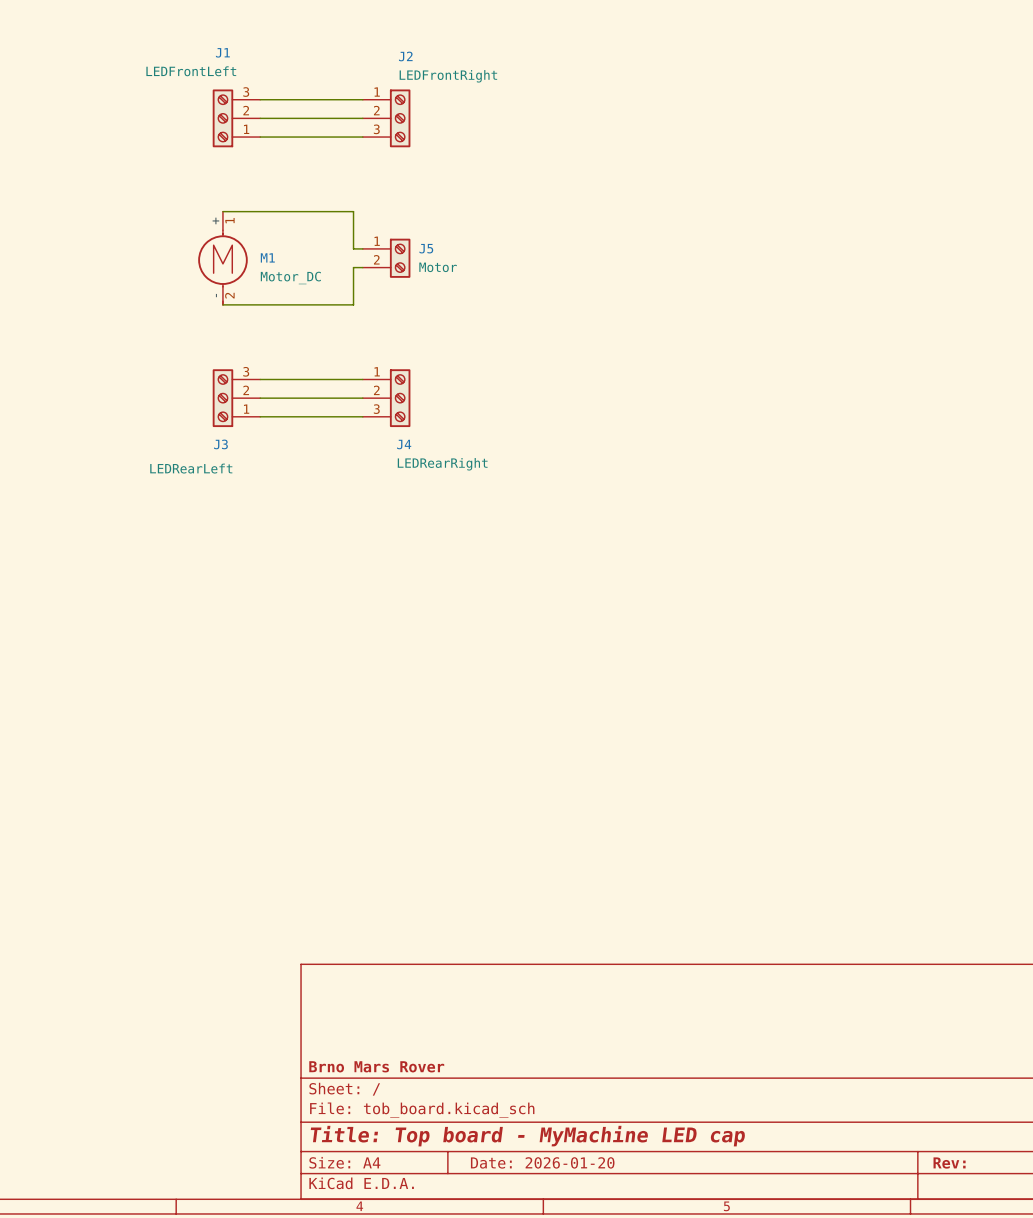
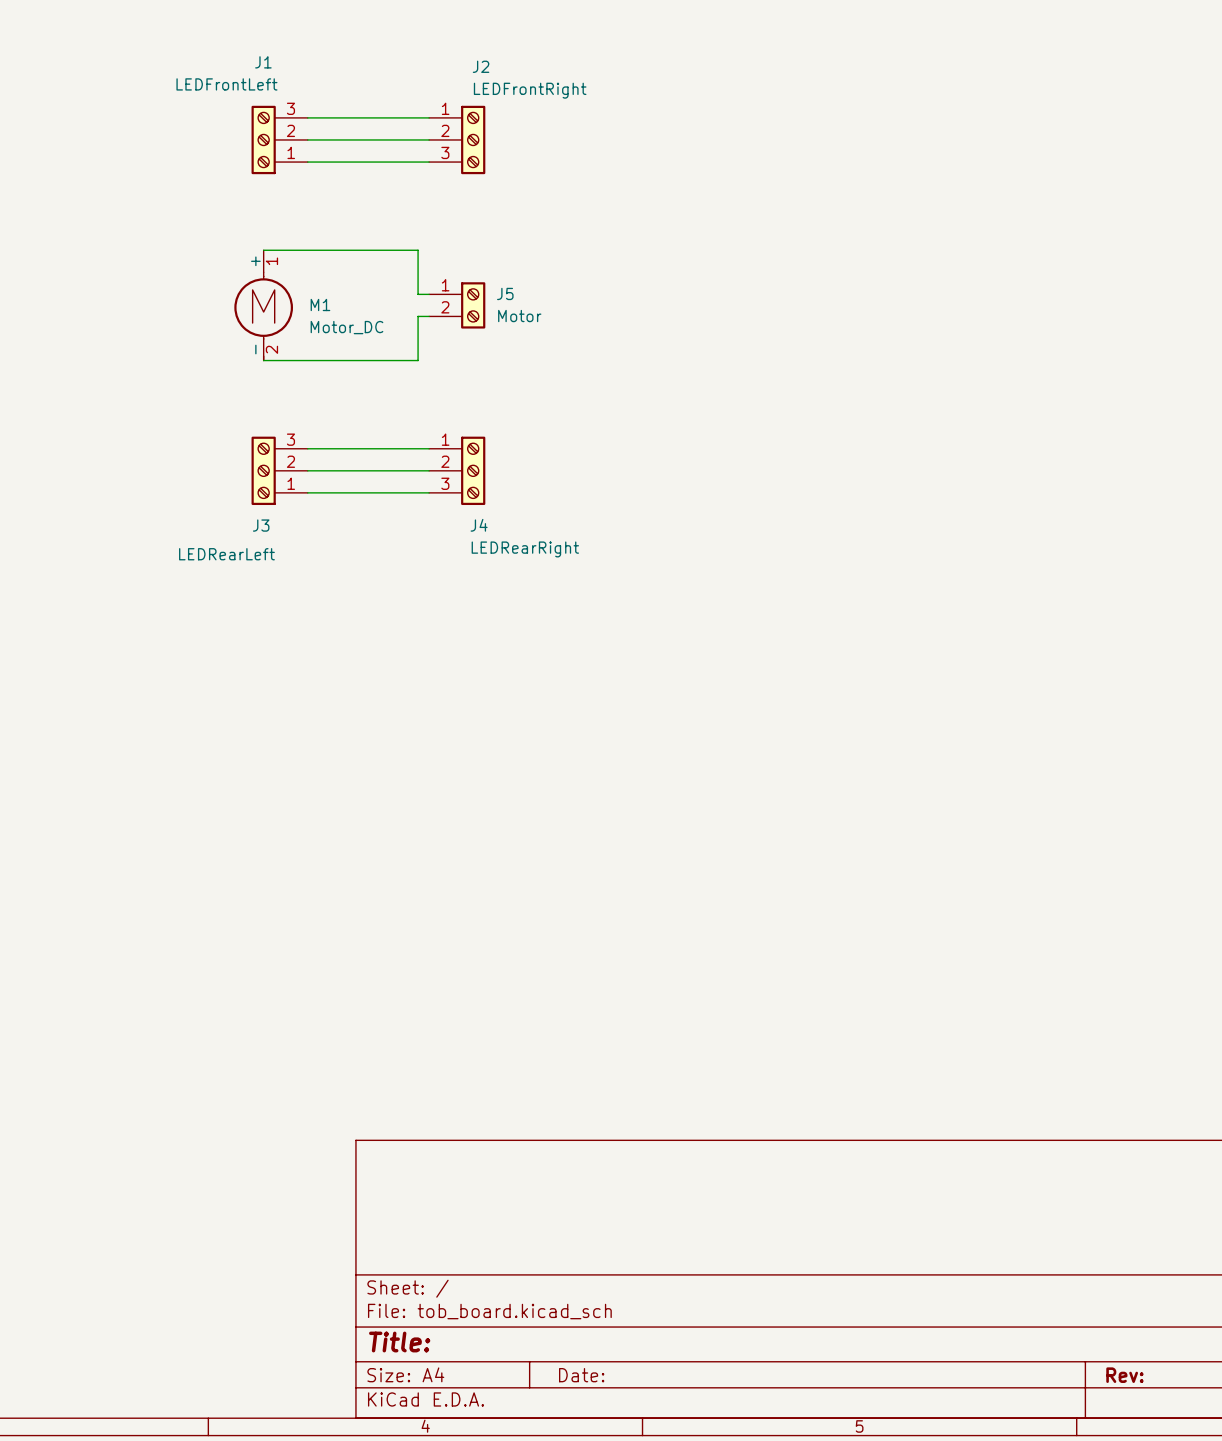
title block: Brno Mars Rover (376, 1066) -> none
title block: Title: Top board - MyMachine LED cap (527, 1136) -> Title: (399, 1342)
title block: Date: 2026-01-20 (542, 1162) -> Date: (581, 1375)

